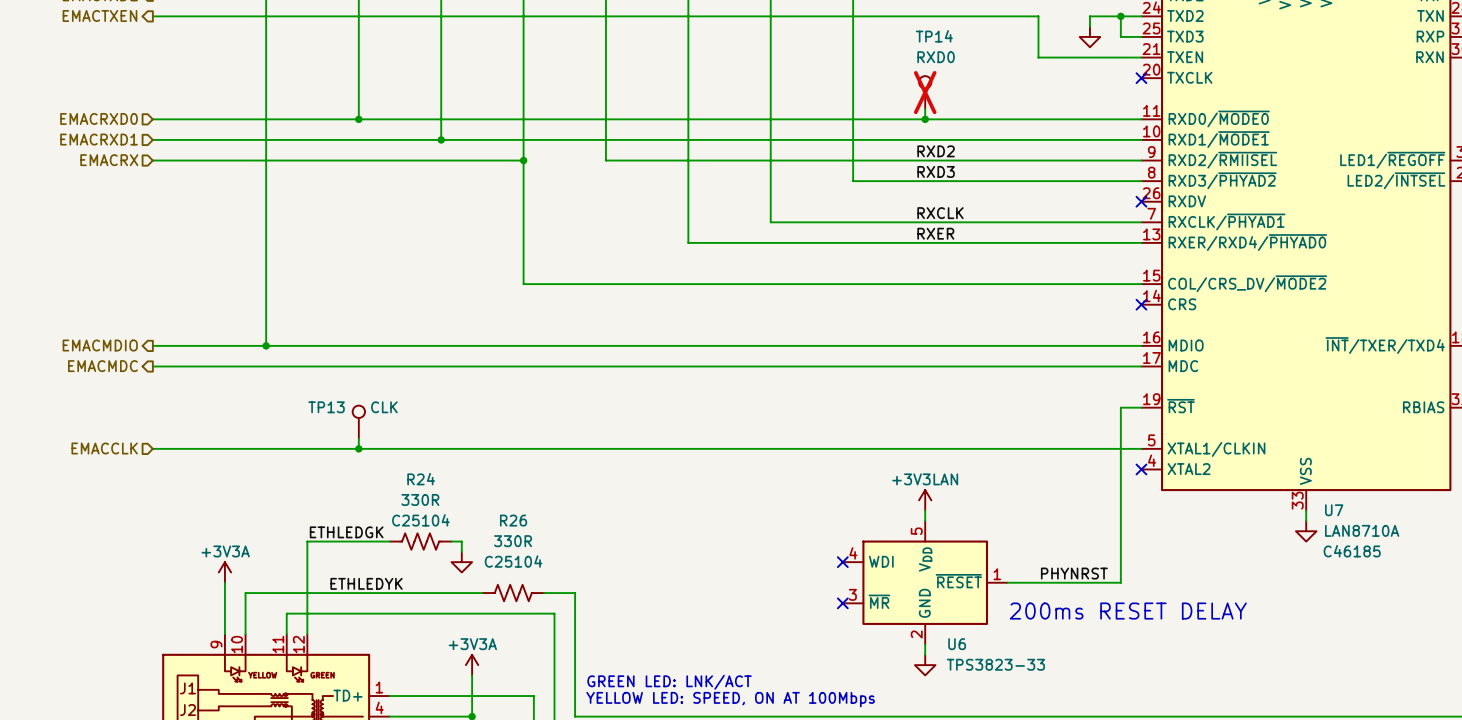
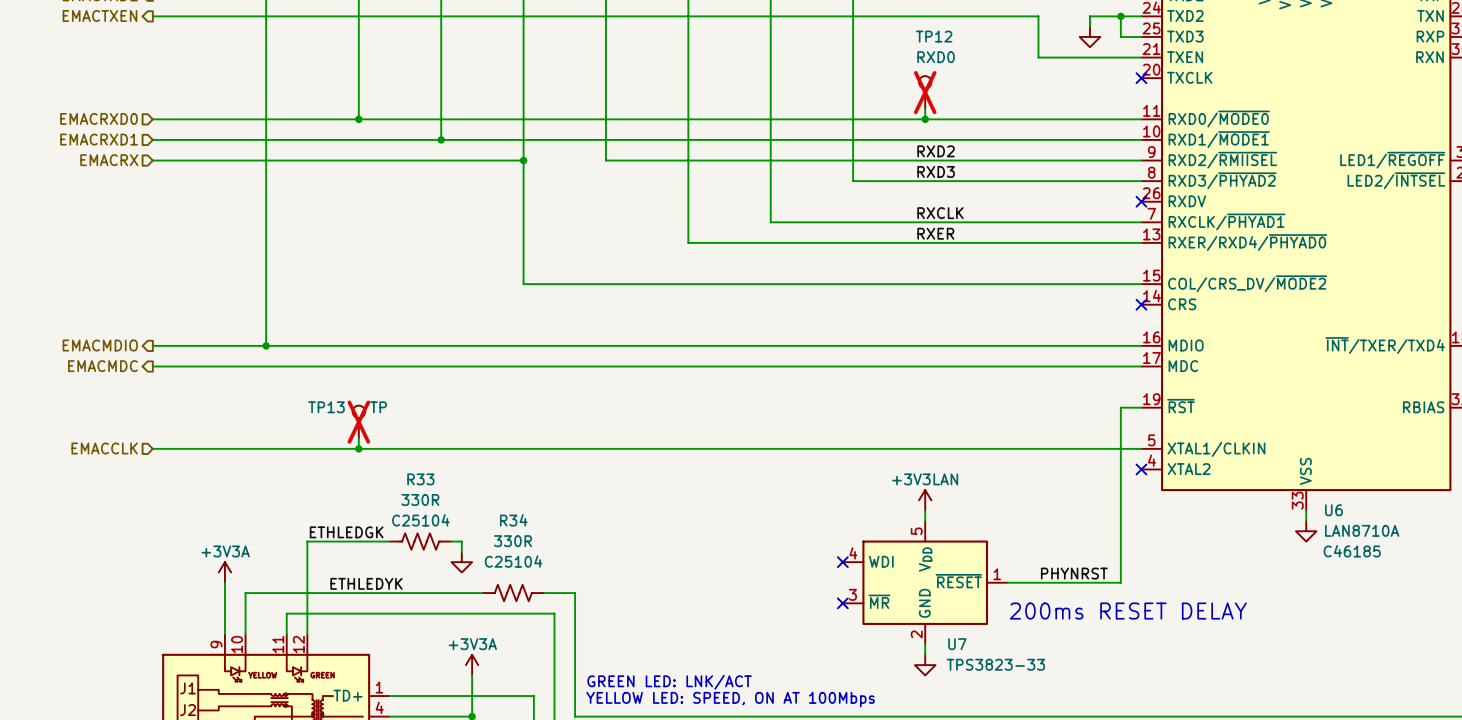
TP14 name: TP14 (934, 36) -> TP12 (934, 36)
TP13 value: CLK (384, 407) -> TP (378, 407)
TP13 do-not-place cross: none -> (358, 422)
R24 name: R24 (421, 479) -> R33 (420, 479)
U7 name: U7 (1334, 510) -> U6 (1333, 510)
R26 name: R26 (513, 520) -> R34 (513, 520)
U6 name: U6 (957, 644) -> U7 (957, 644)

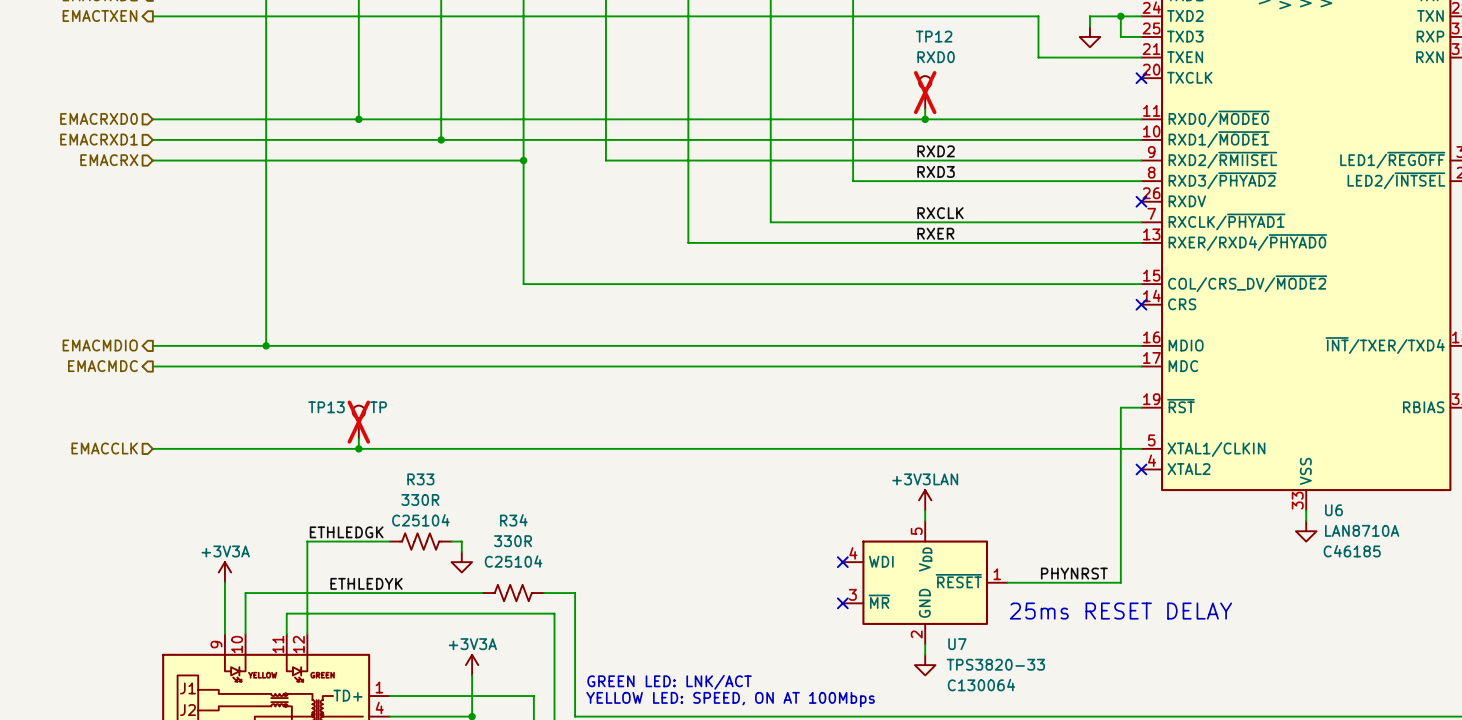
text: 200ms RESET DELAY (1128, 611) -> 25ms RESET DELAY (1120, 611)
U7 value: TPS3823-33 (995, 664) -> TPS3820-33 (995, 664)
U7 text: none -> C130064 (981, 685)

